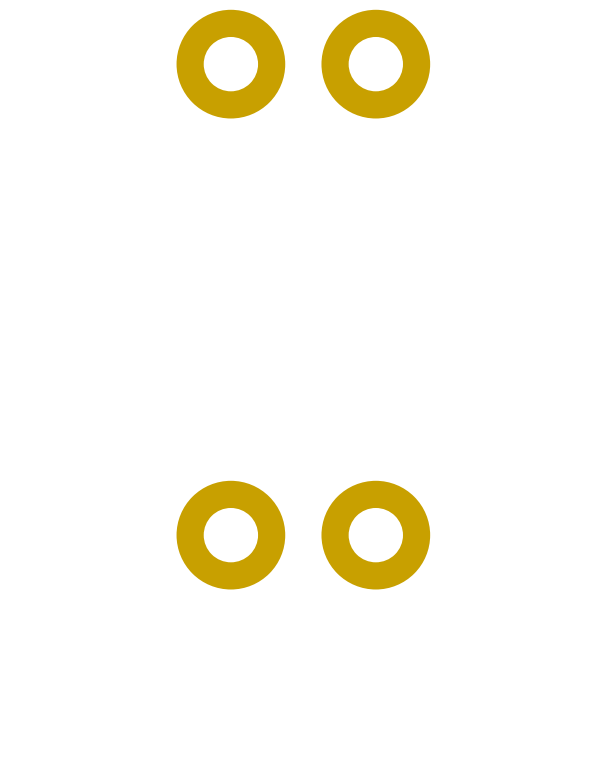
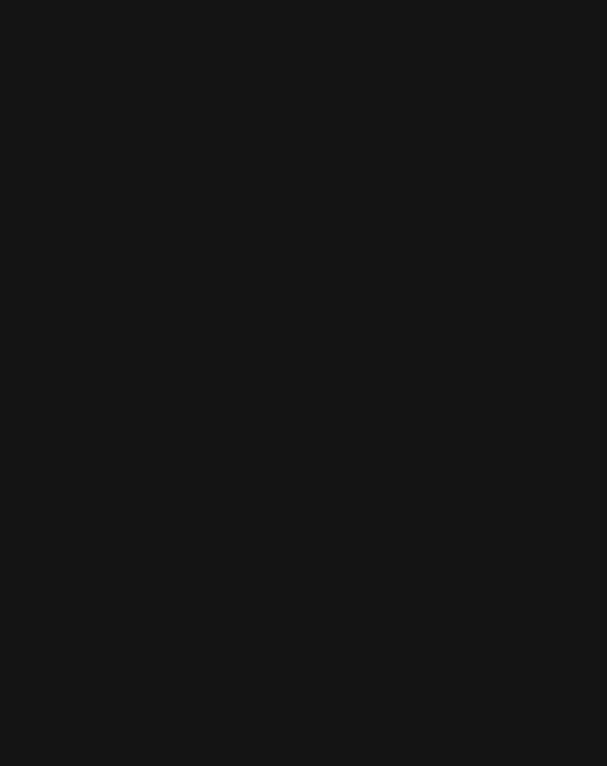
part: (303, 64) -> none
part: (303, 535) -> none

